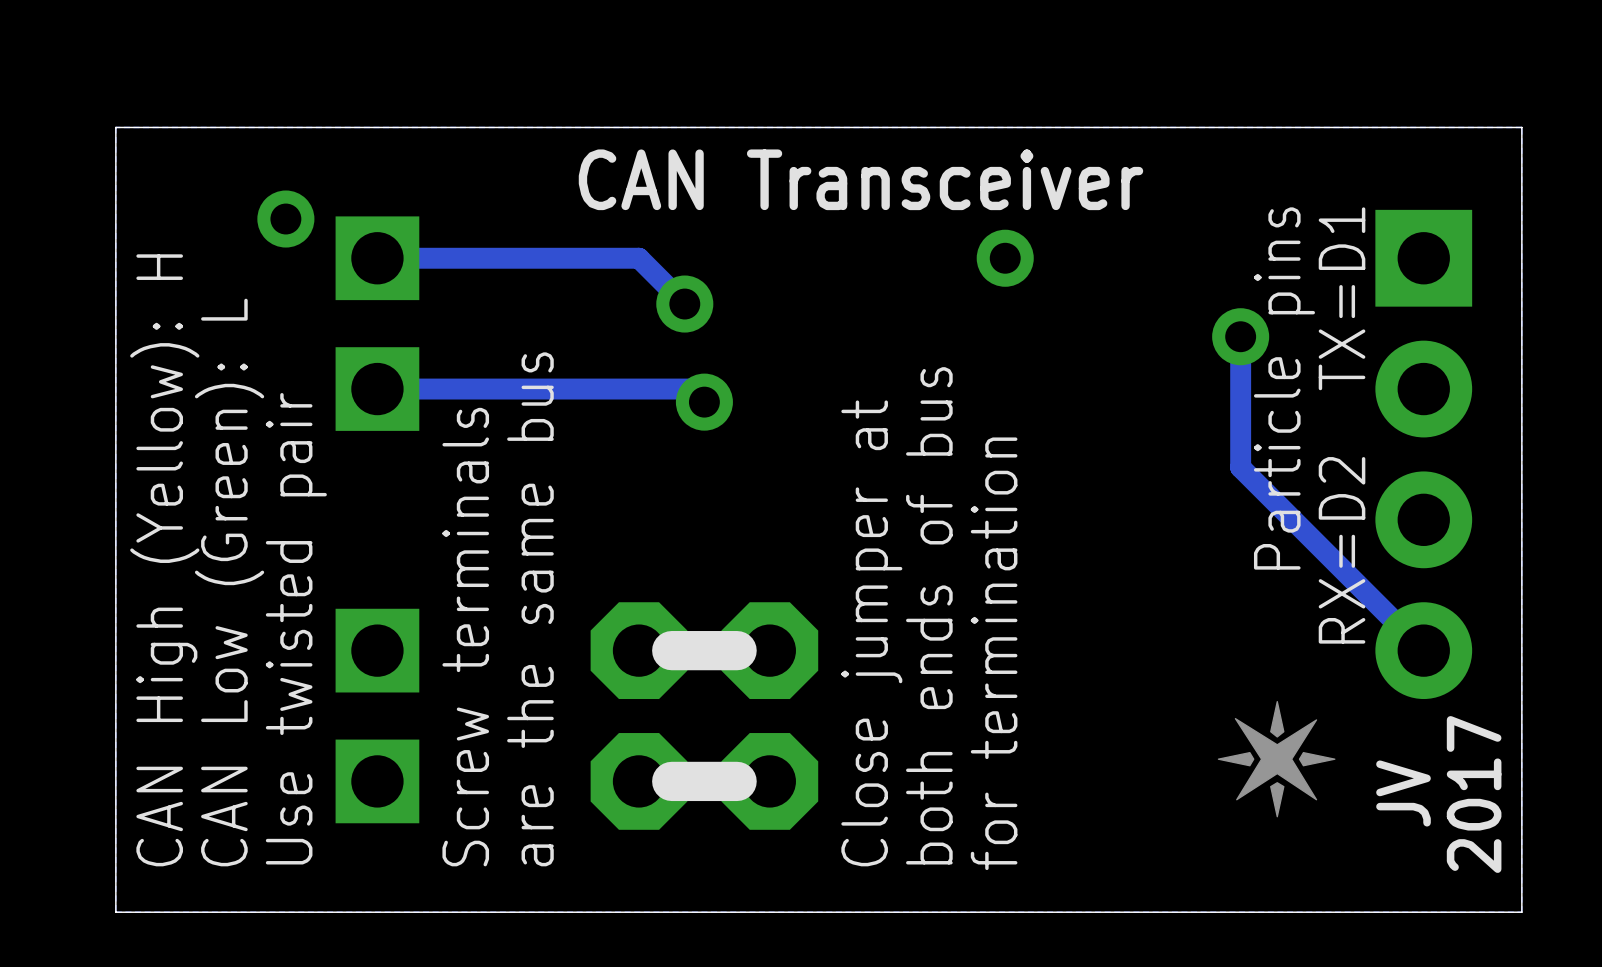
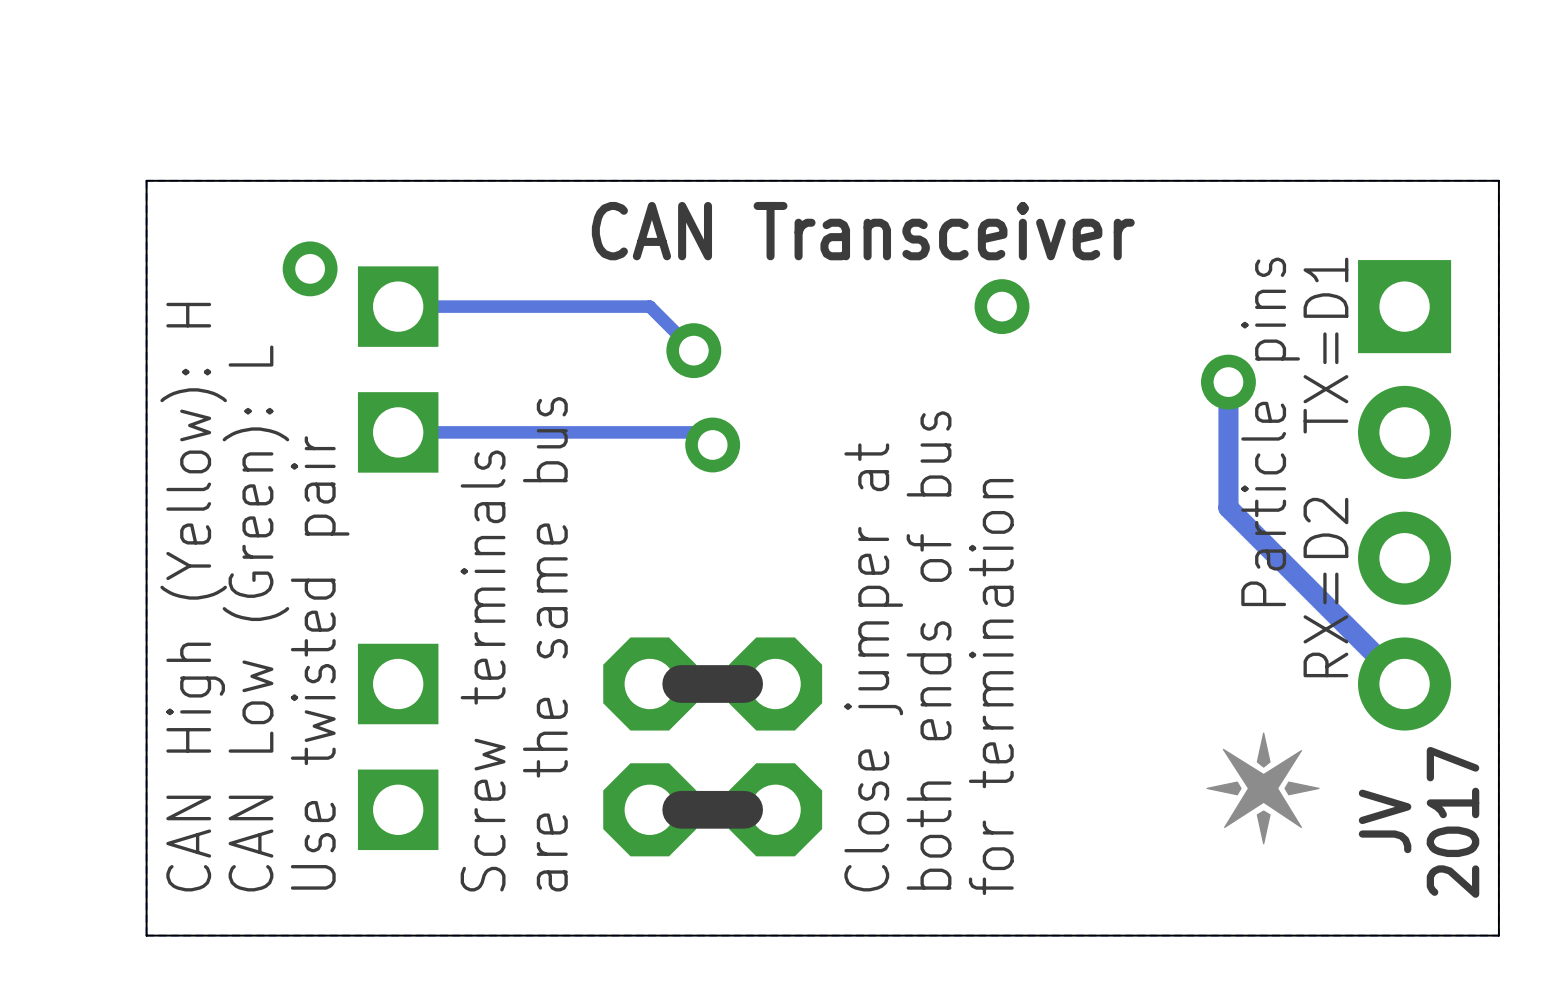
track width: thick (377, 258) (639, 258) (684, 304) -> thin (398, 306) (649, 306) (693, 350)
track width: thick (377, 389) (691, 389) (704, 402) -> thin (398, 432) (700, 432) (712, 444)

